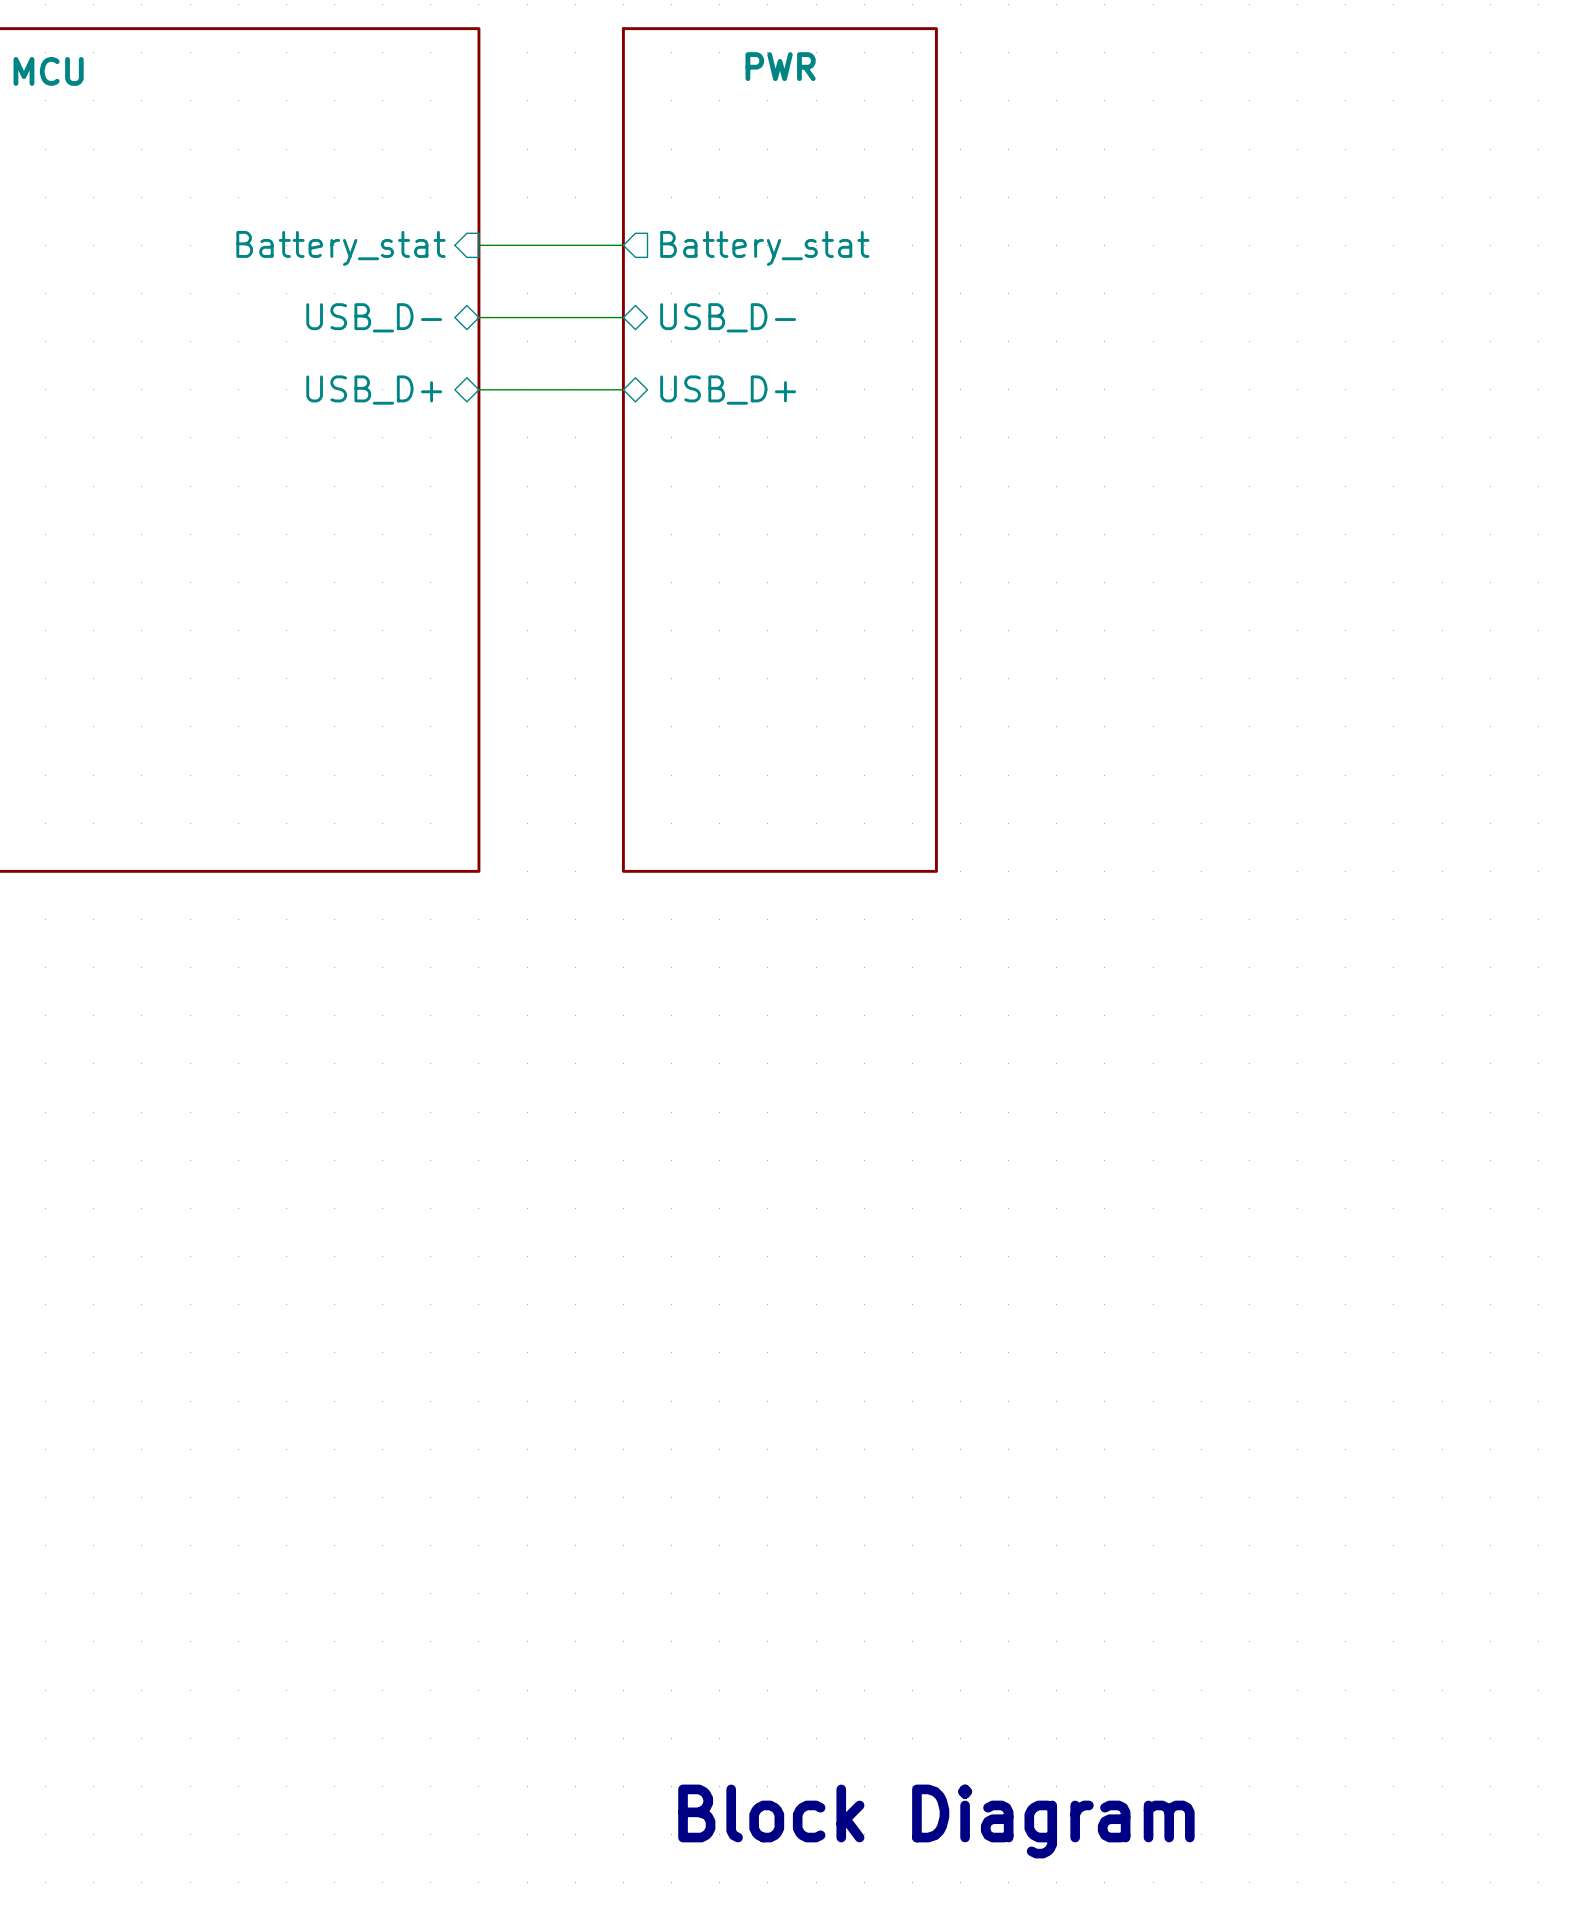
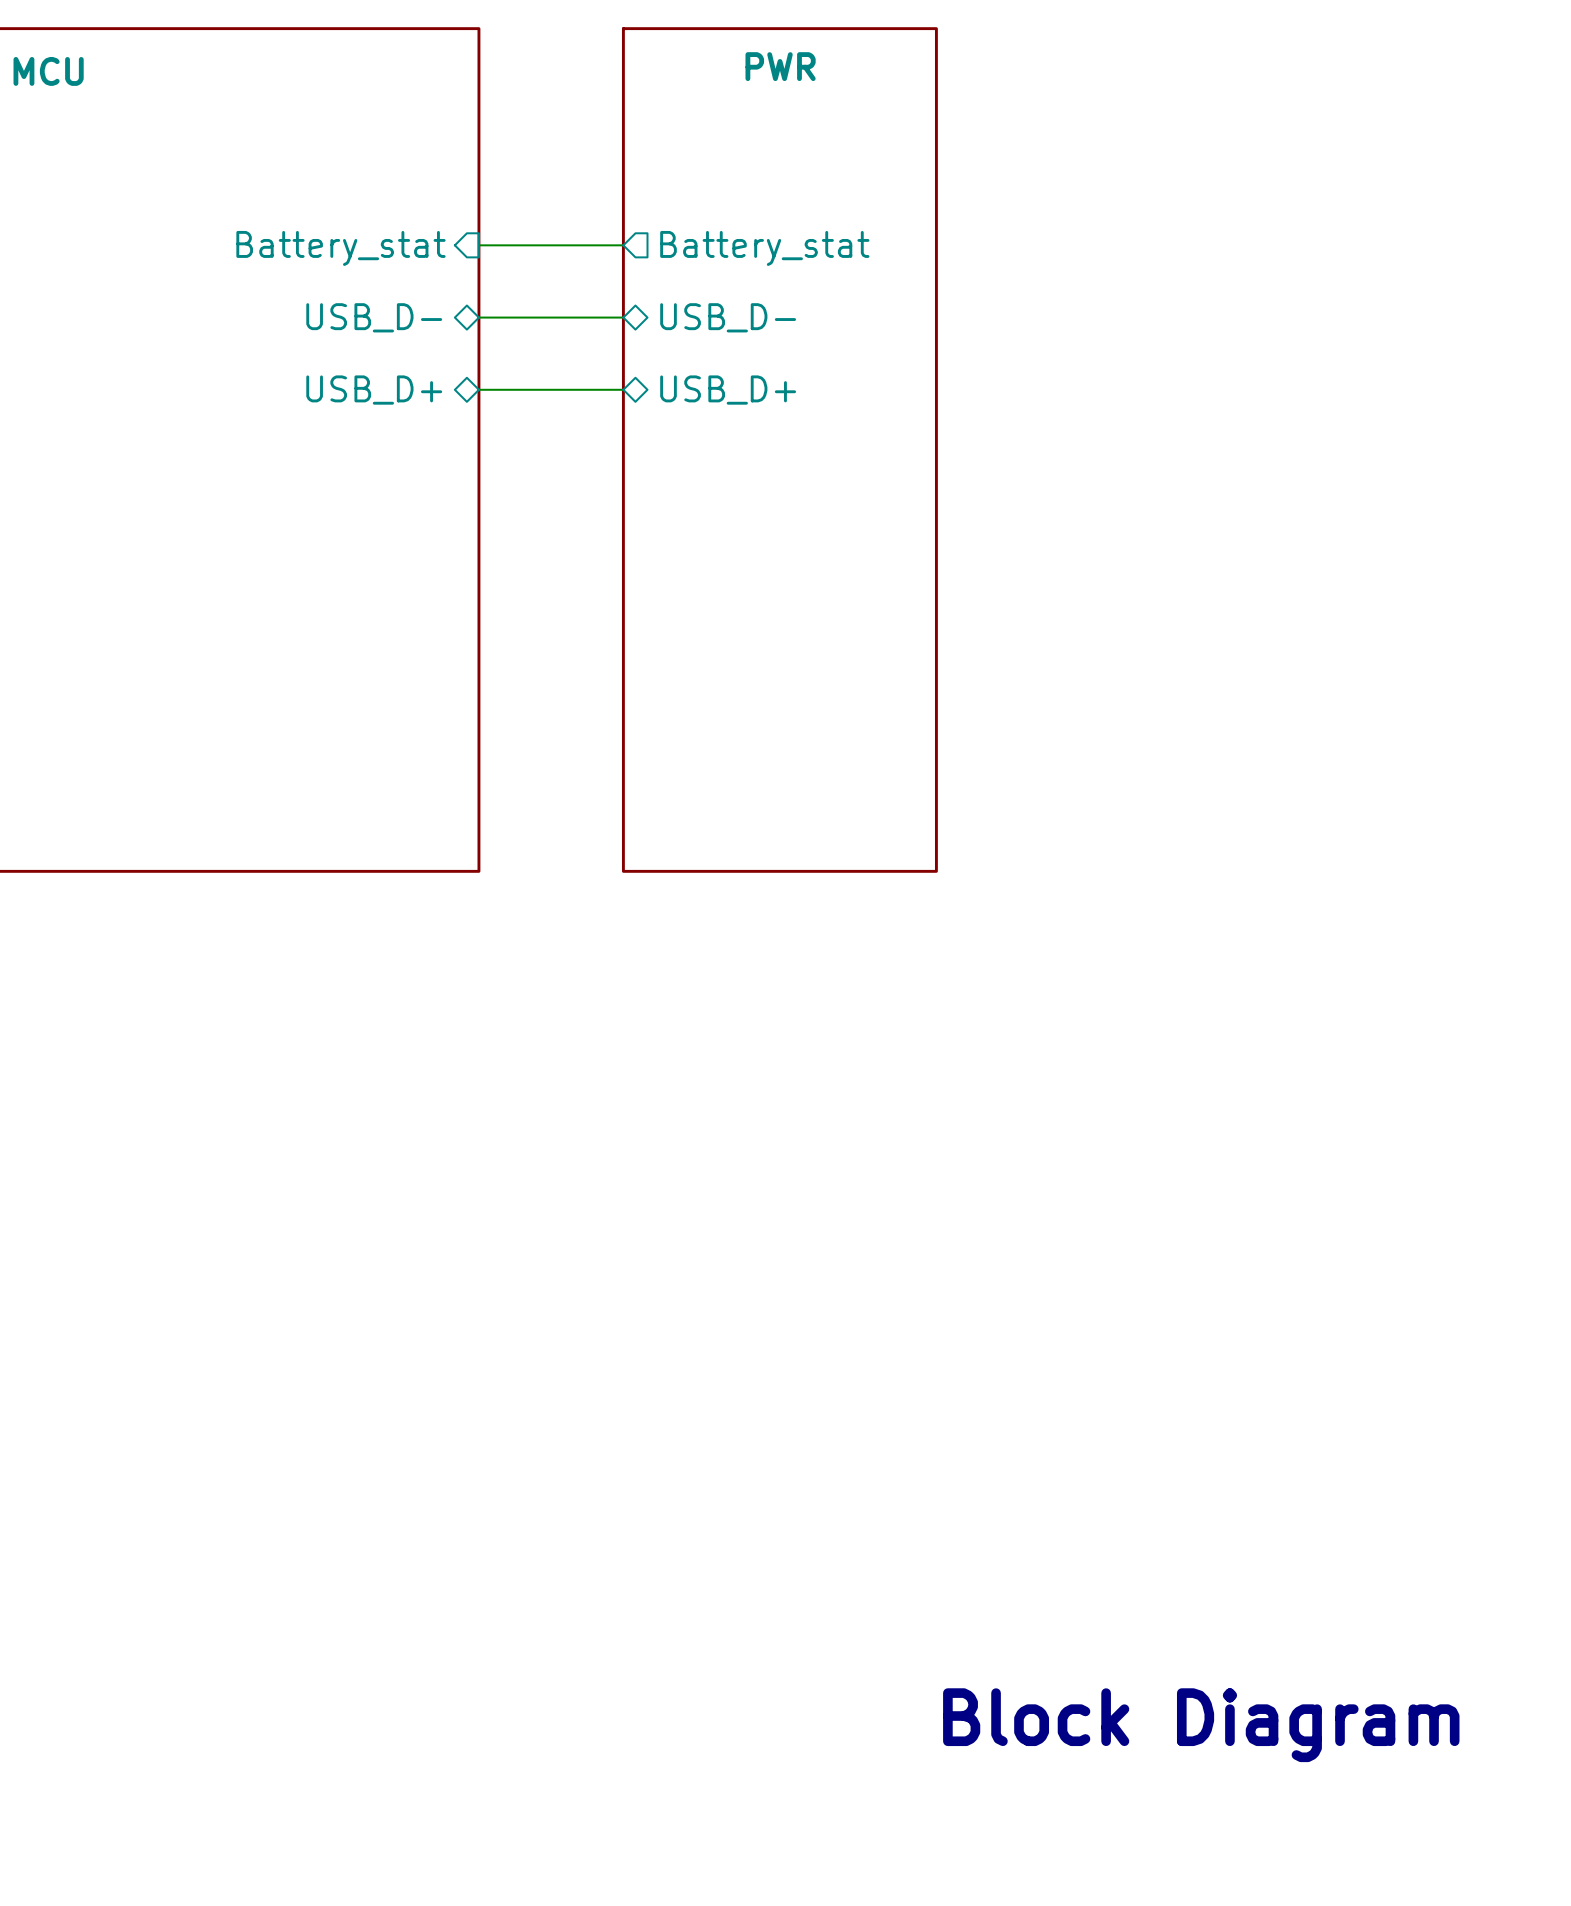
text position: Block Diagram (936, 1821) -> Block Diagram (1201, 1725)

